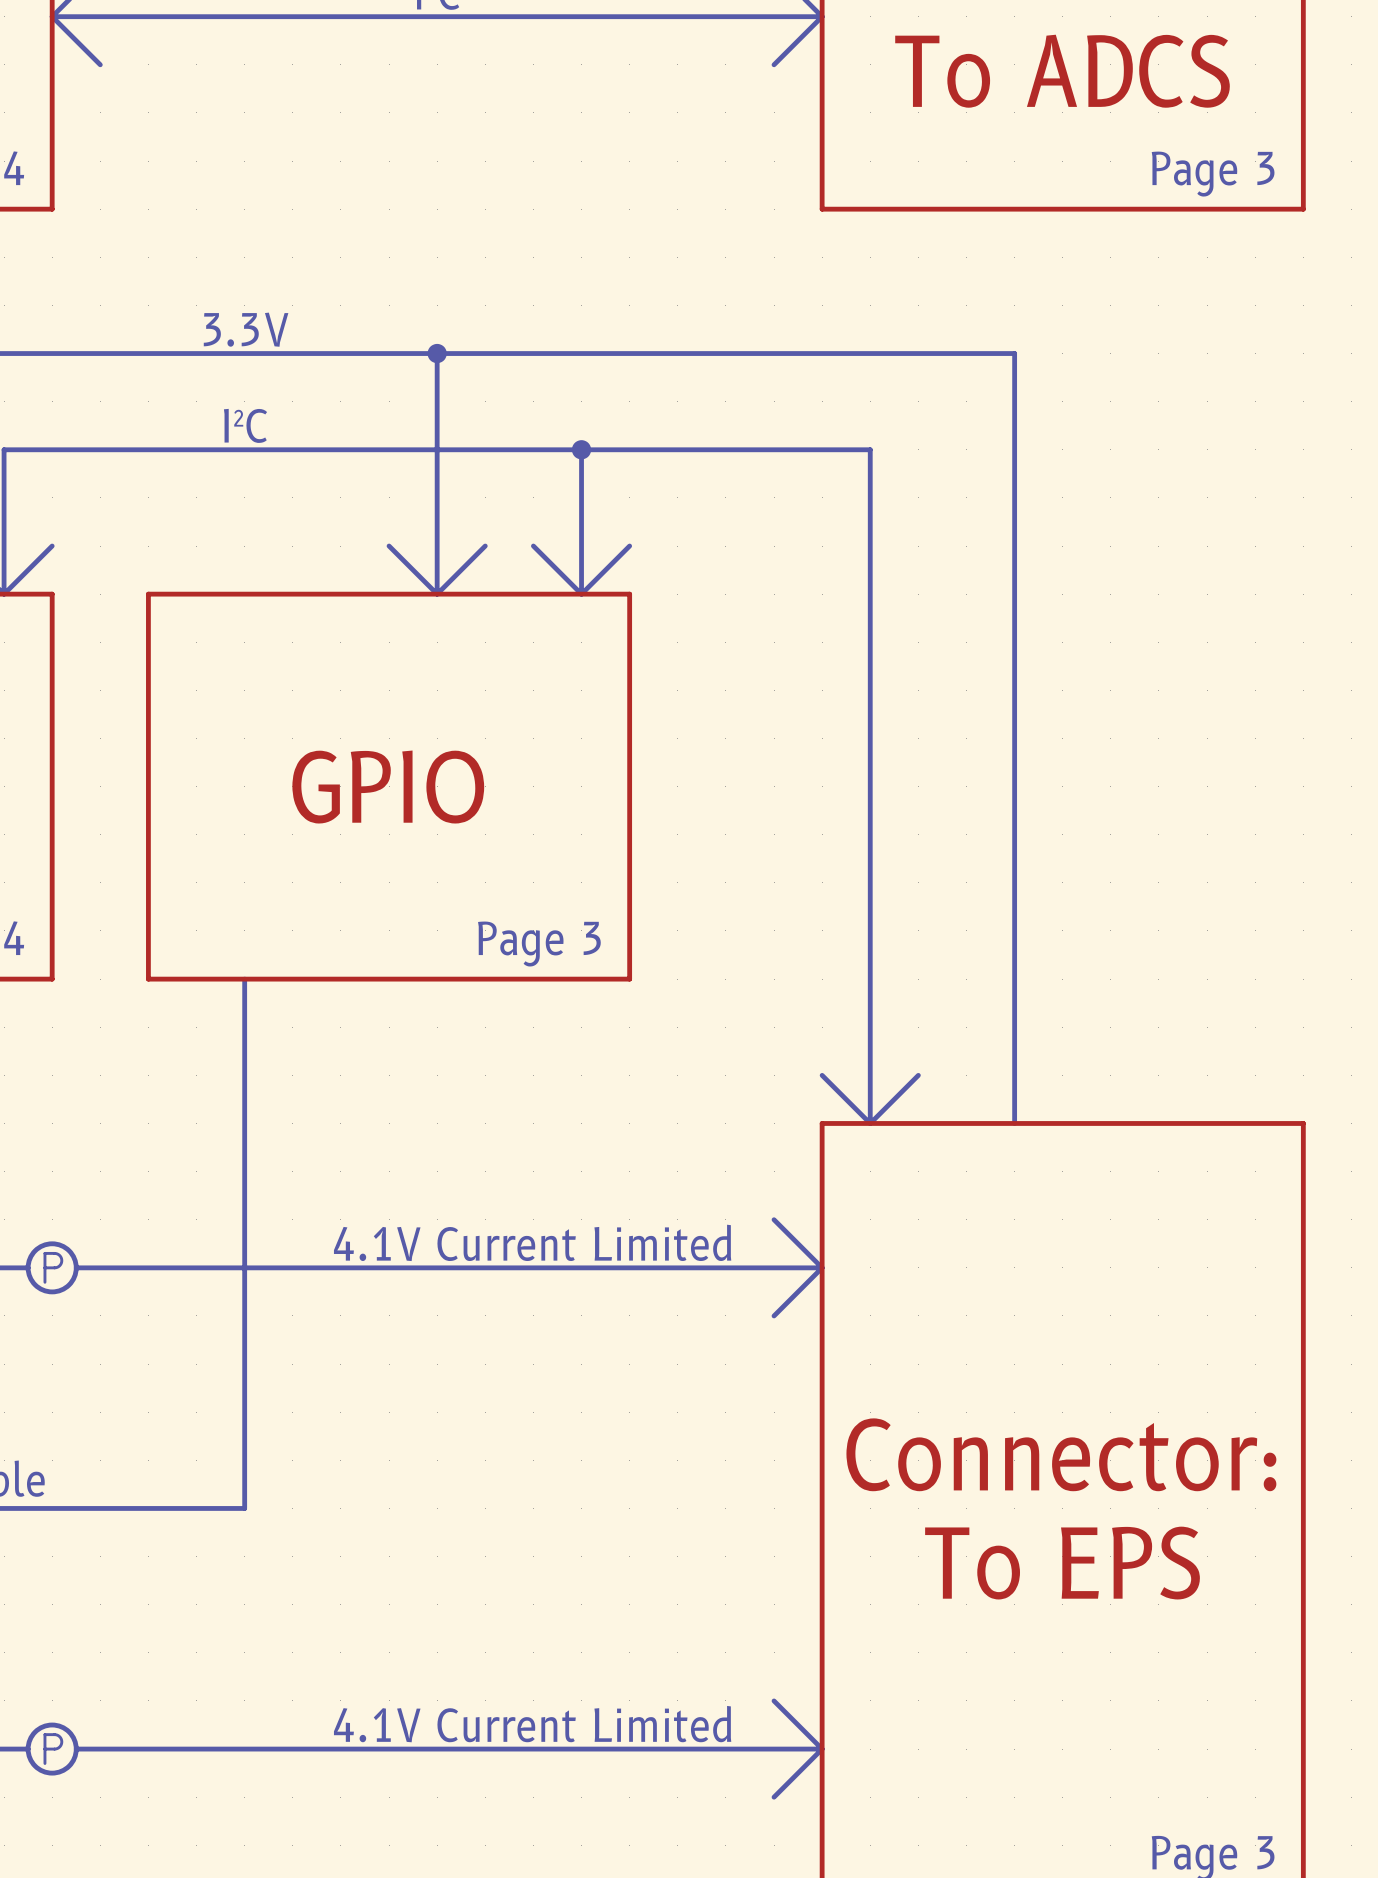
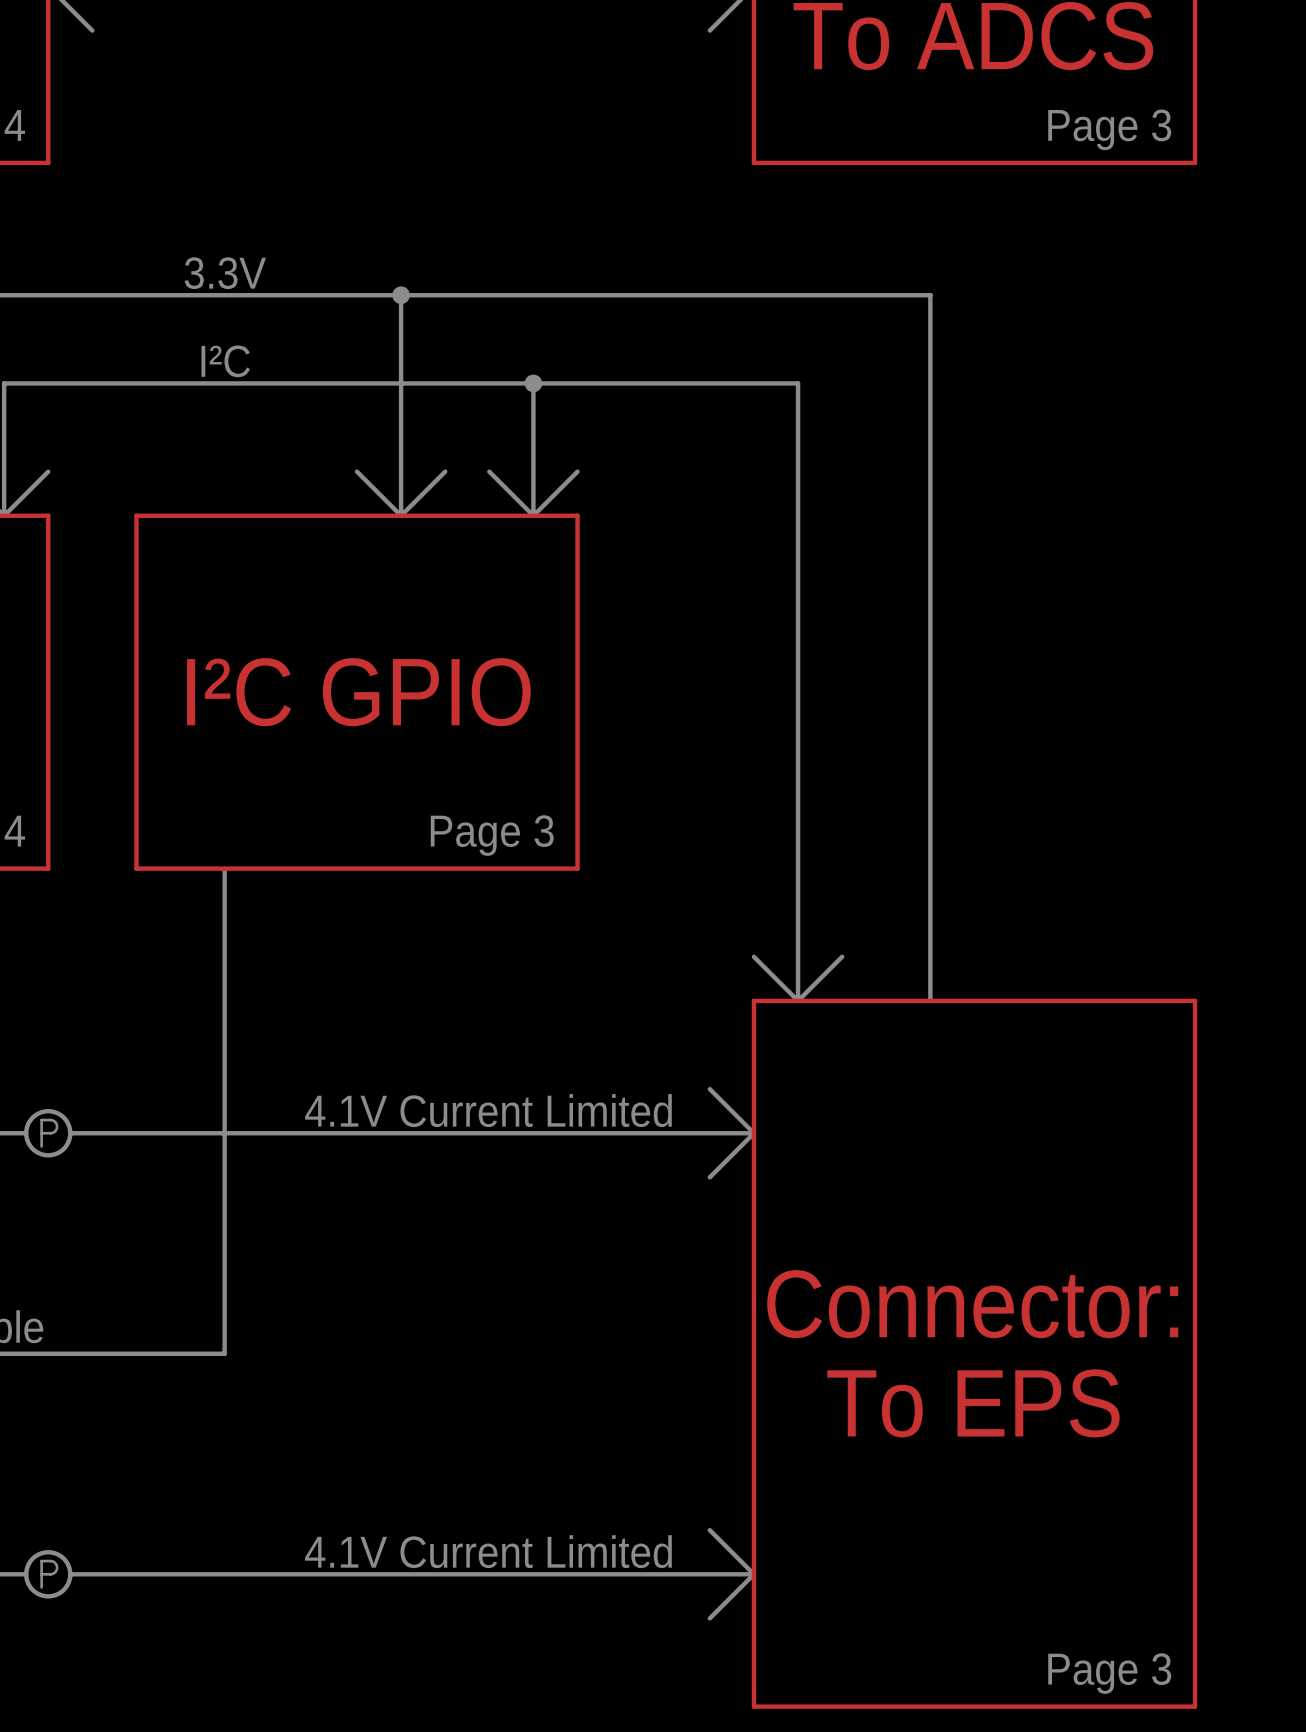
text: GPIO (388, 787) -> I²C GPIO (358, 692)

